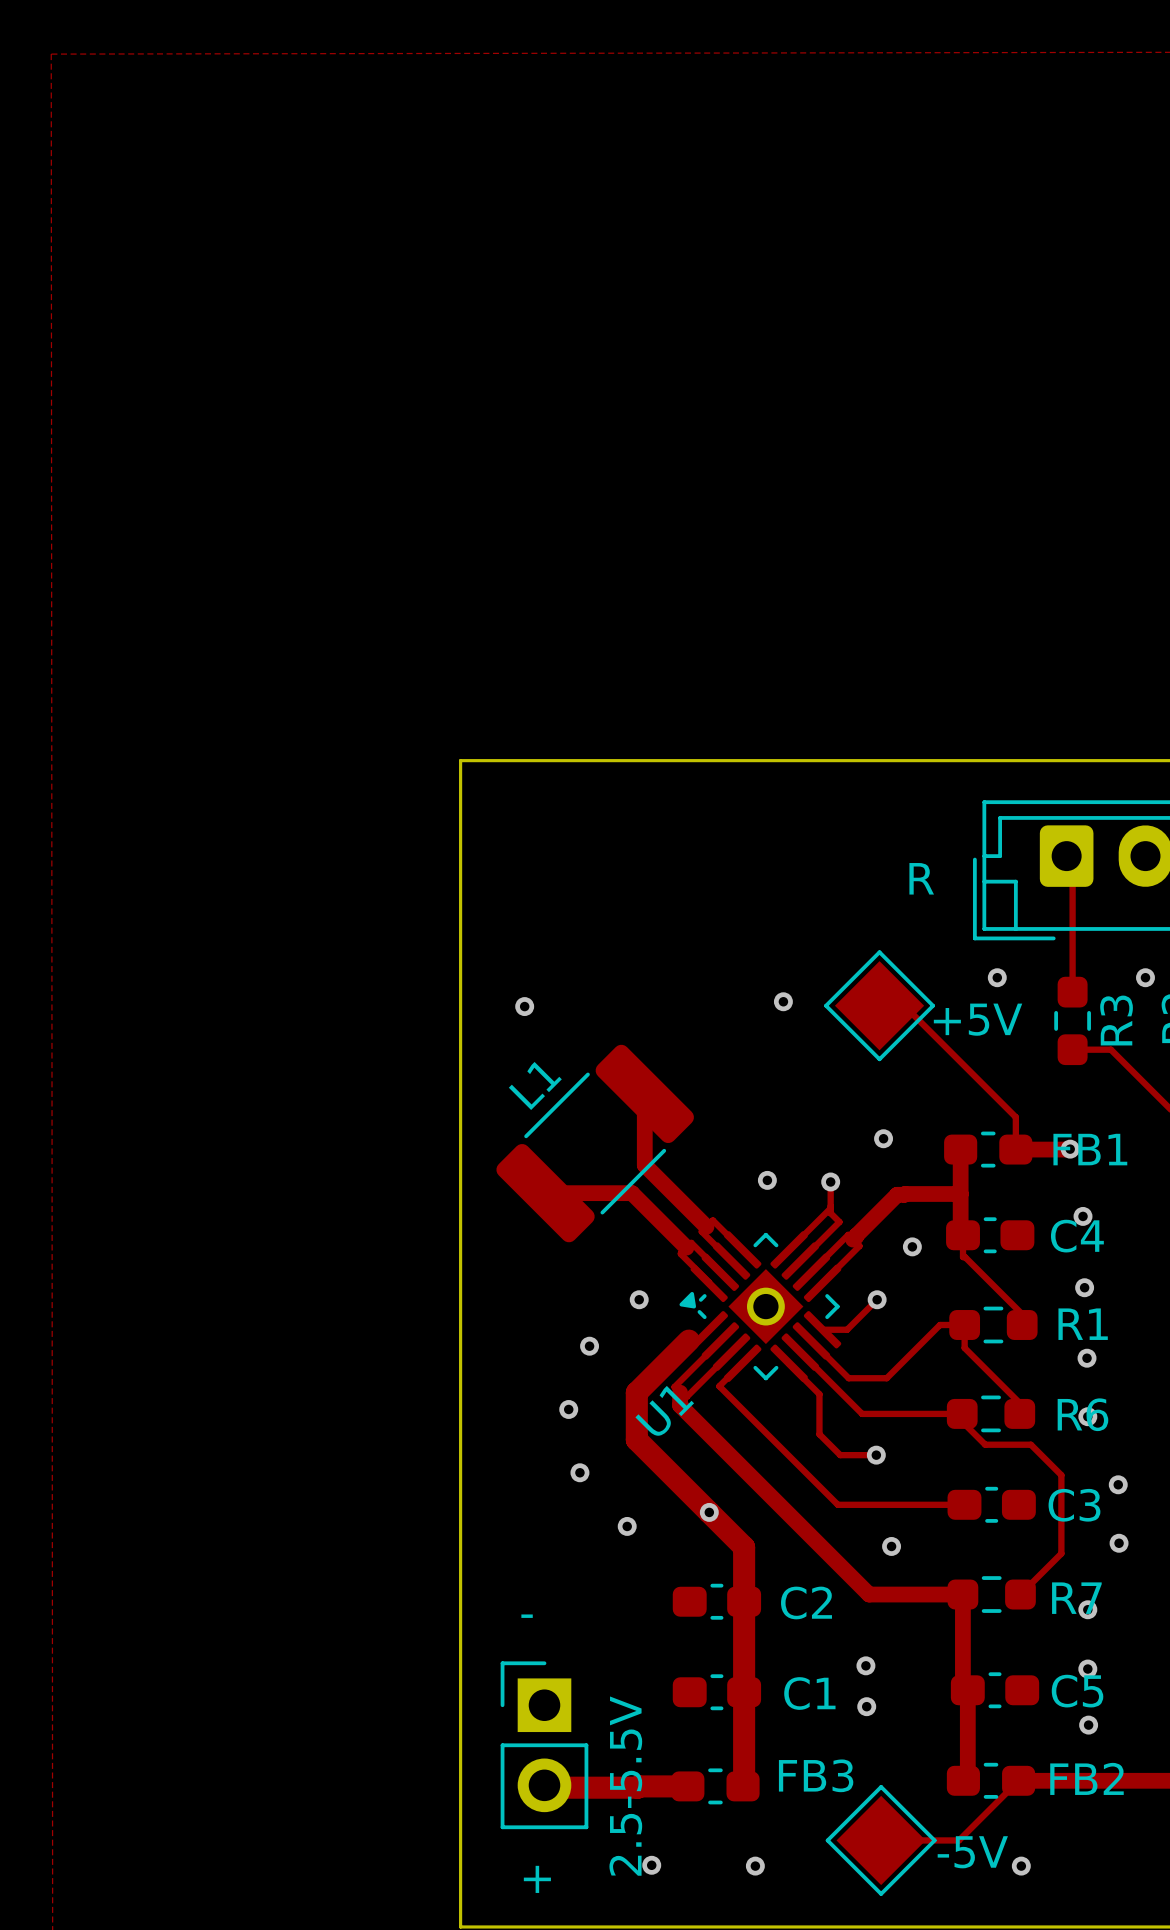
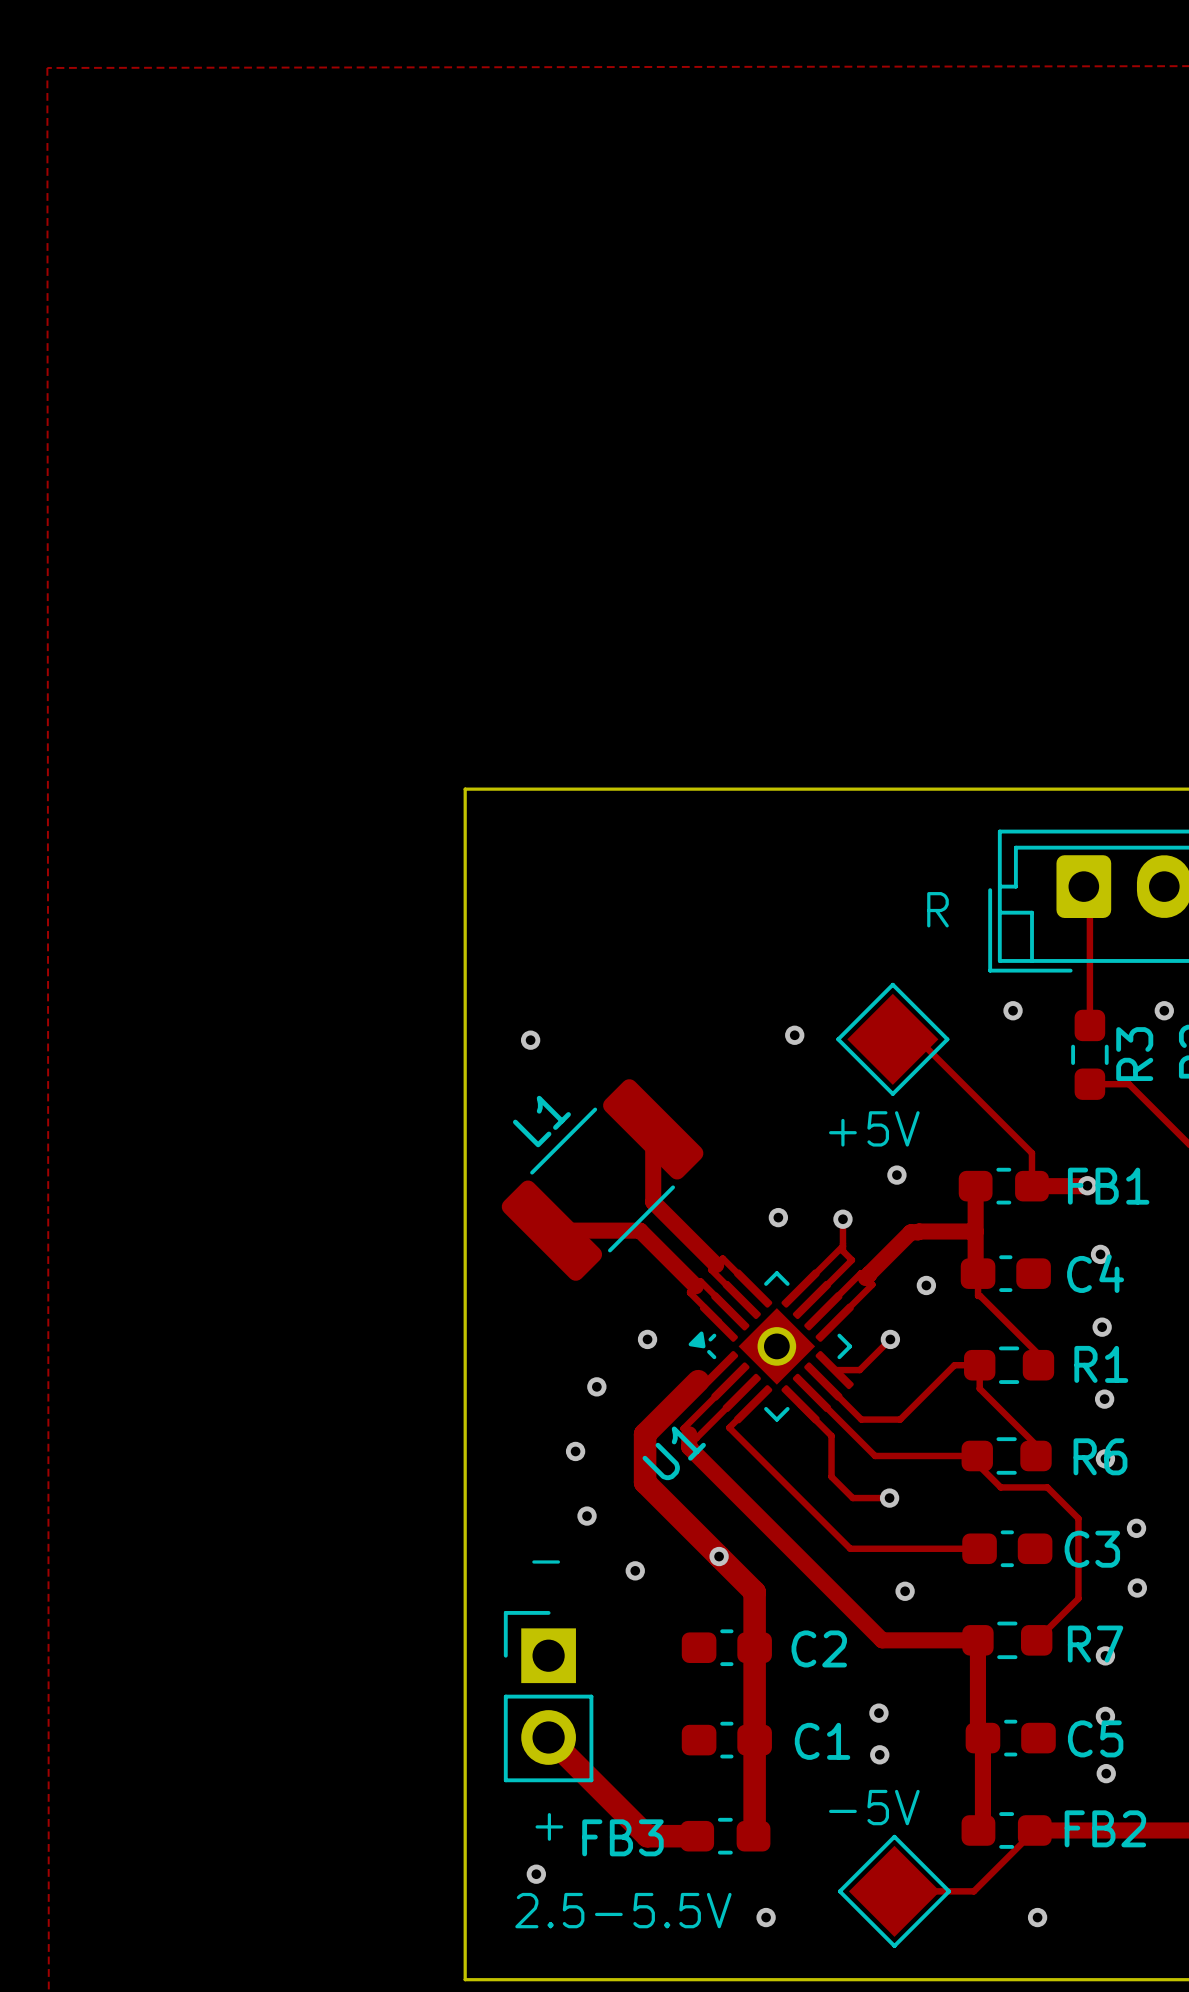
text position: +5V (978, 1019) -> +5V (874, 1128)
text position: - (527, 1616) -> - (546, 1562)
part position: (544, 1745) -> (548, 1696)
text: none -> + (549, 1826)
FB3 name position: FB3 (816, 1775) -> FB3 (622, 1837)
text: 2.5-5.5V (625, 1786) -> none
track: (639, 1786) (542, 1787) -> (647, 1836) (548, 1737)
text position: -5V (972, 1852) -> -5V (874, 1807)
via position: (651, 1865) -> (536, 1874)
text: + (537, 1879) -> 2.5-5.5V (623, 1910)

